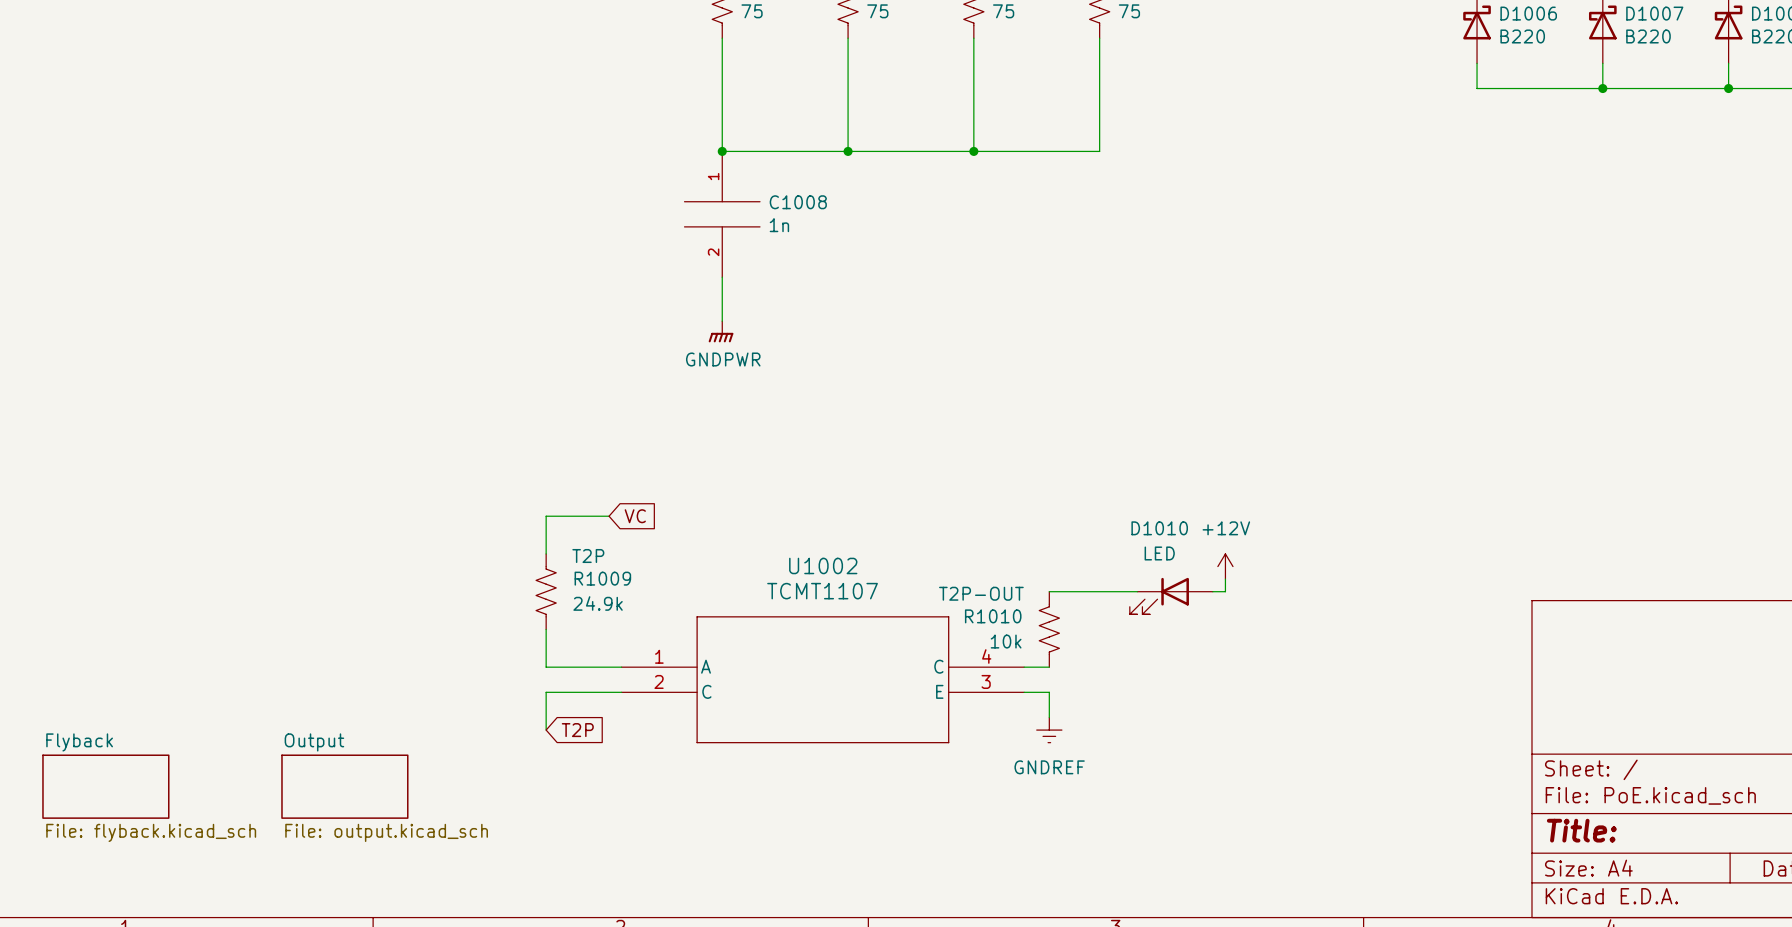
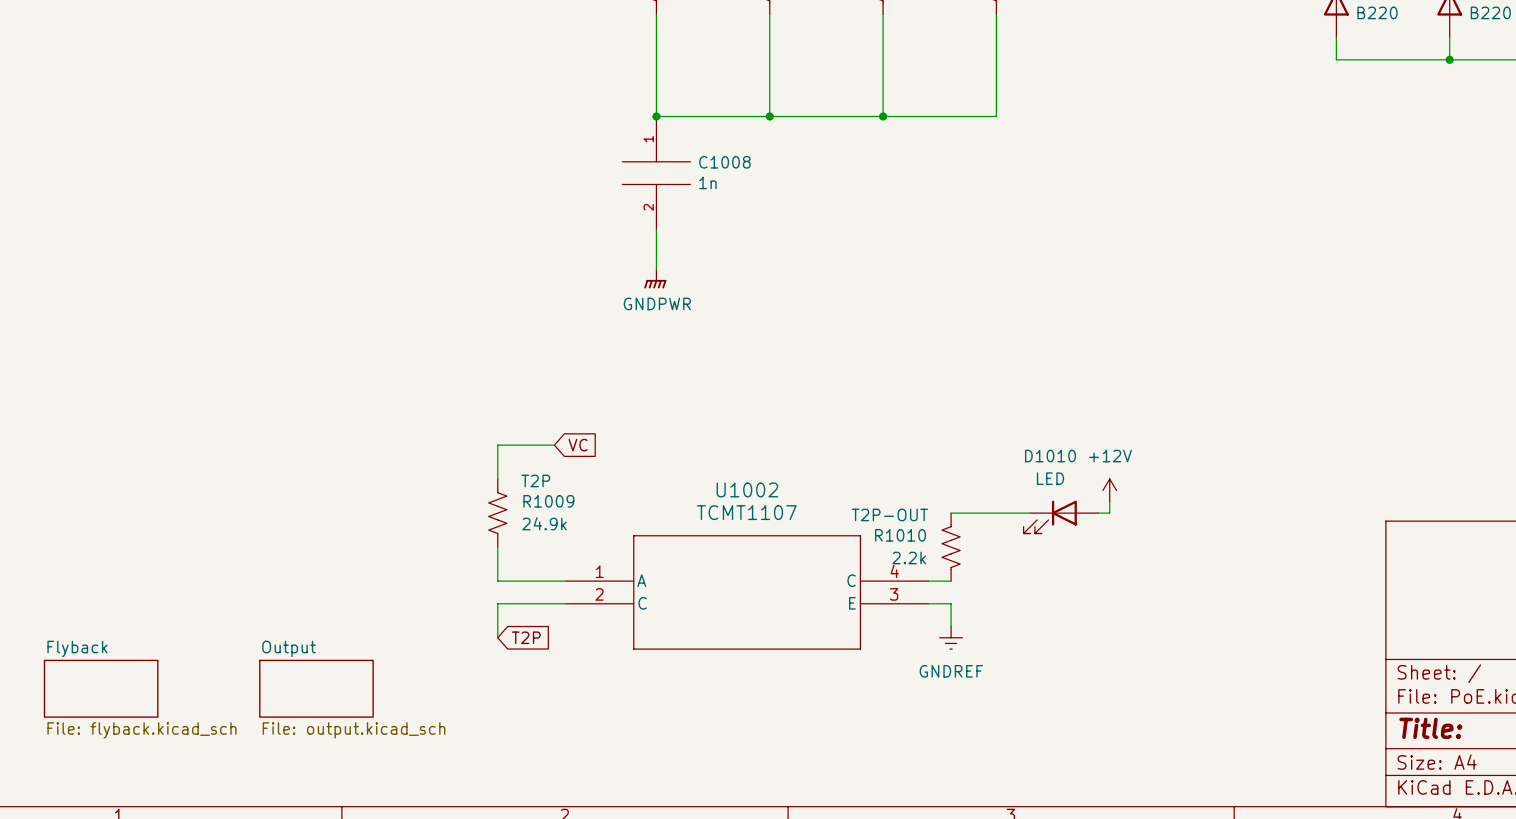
R1010 value: 10k (1006, 641) -> 2.2k (909, 558)

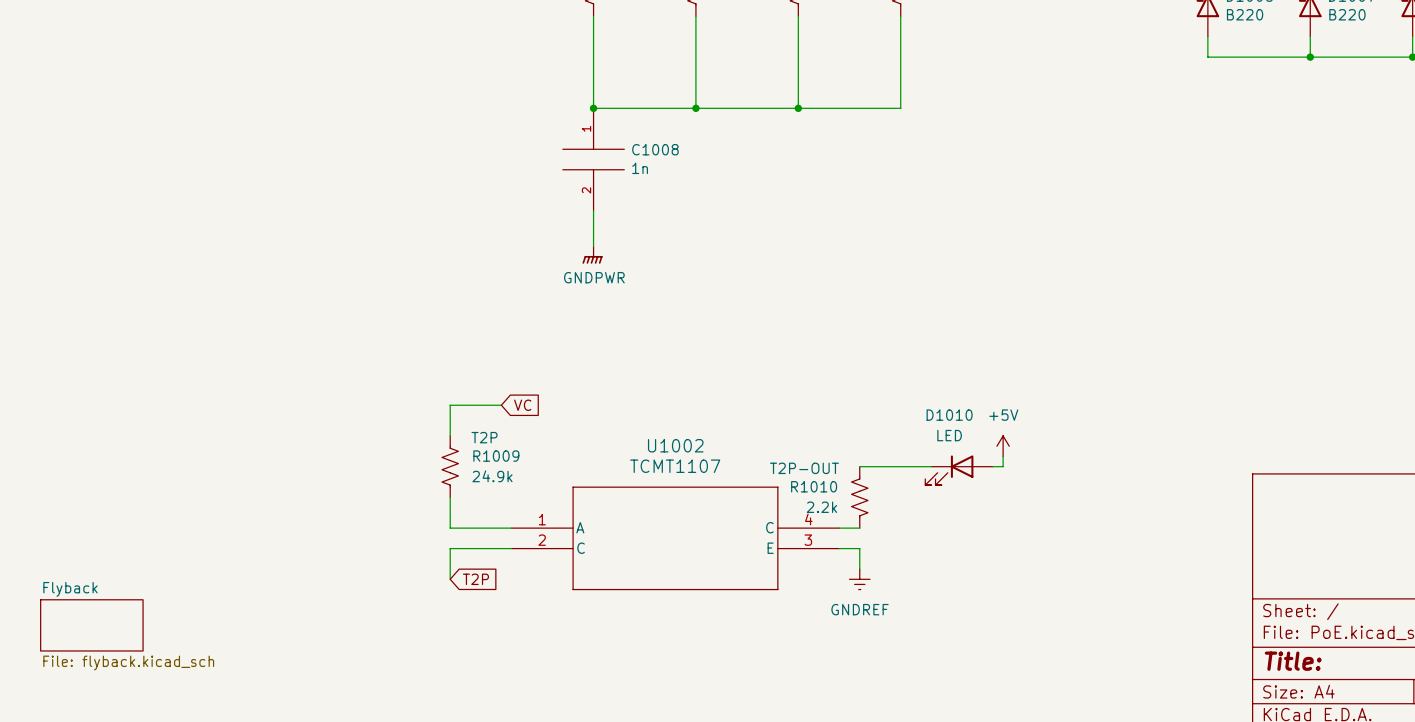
power symbol: +12V (1109, 490) -> +5V (1003, 446)
sheet Output: File: output.kicad_sch (316, 688) -> none

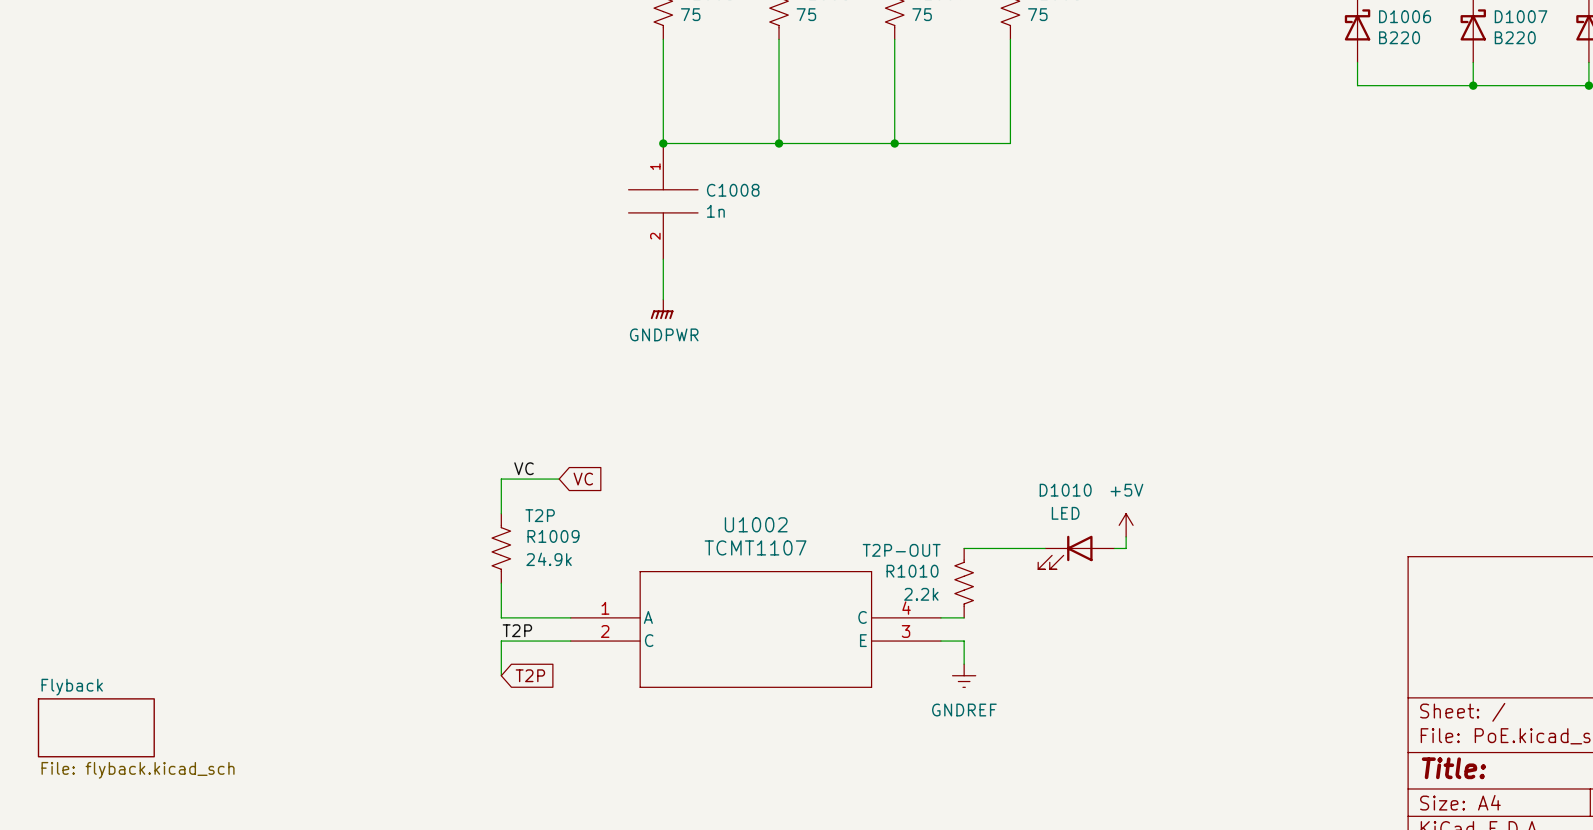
label: none -> VC (523, 468)
label: none -> T2P (517, 630)

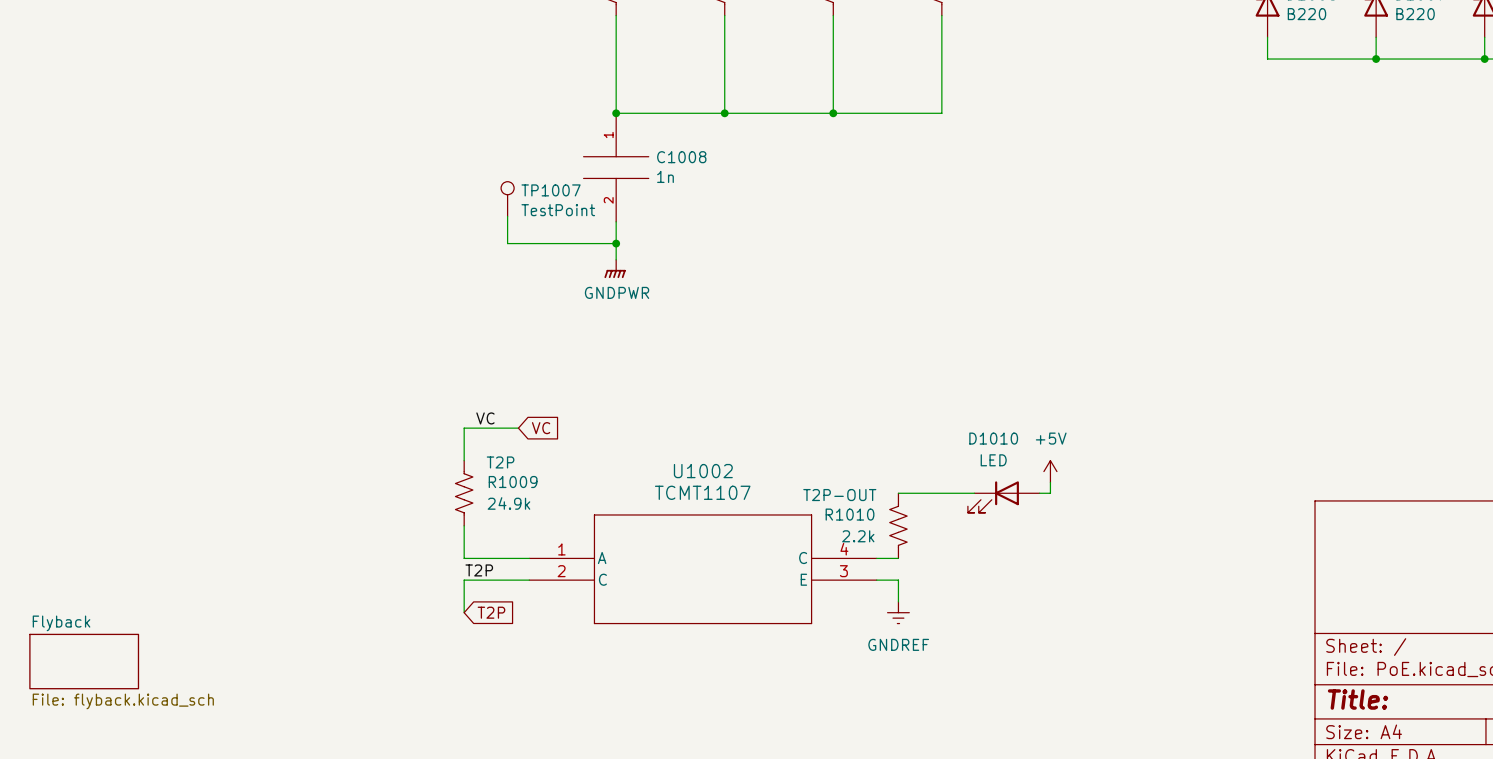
TP1007: none -> TestPoint (507, 199)
wire: none -> (507, 216) (507, 243) (616, 243)
junction: none -> (616, 243)

